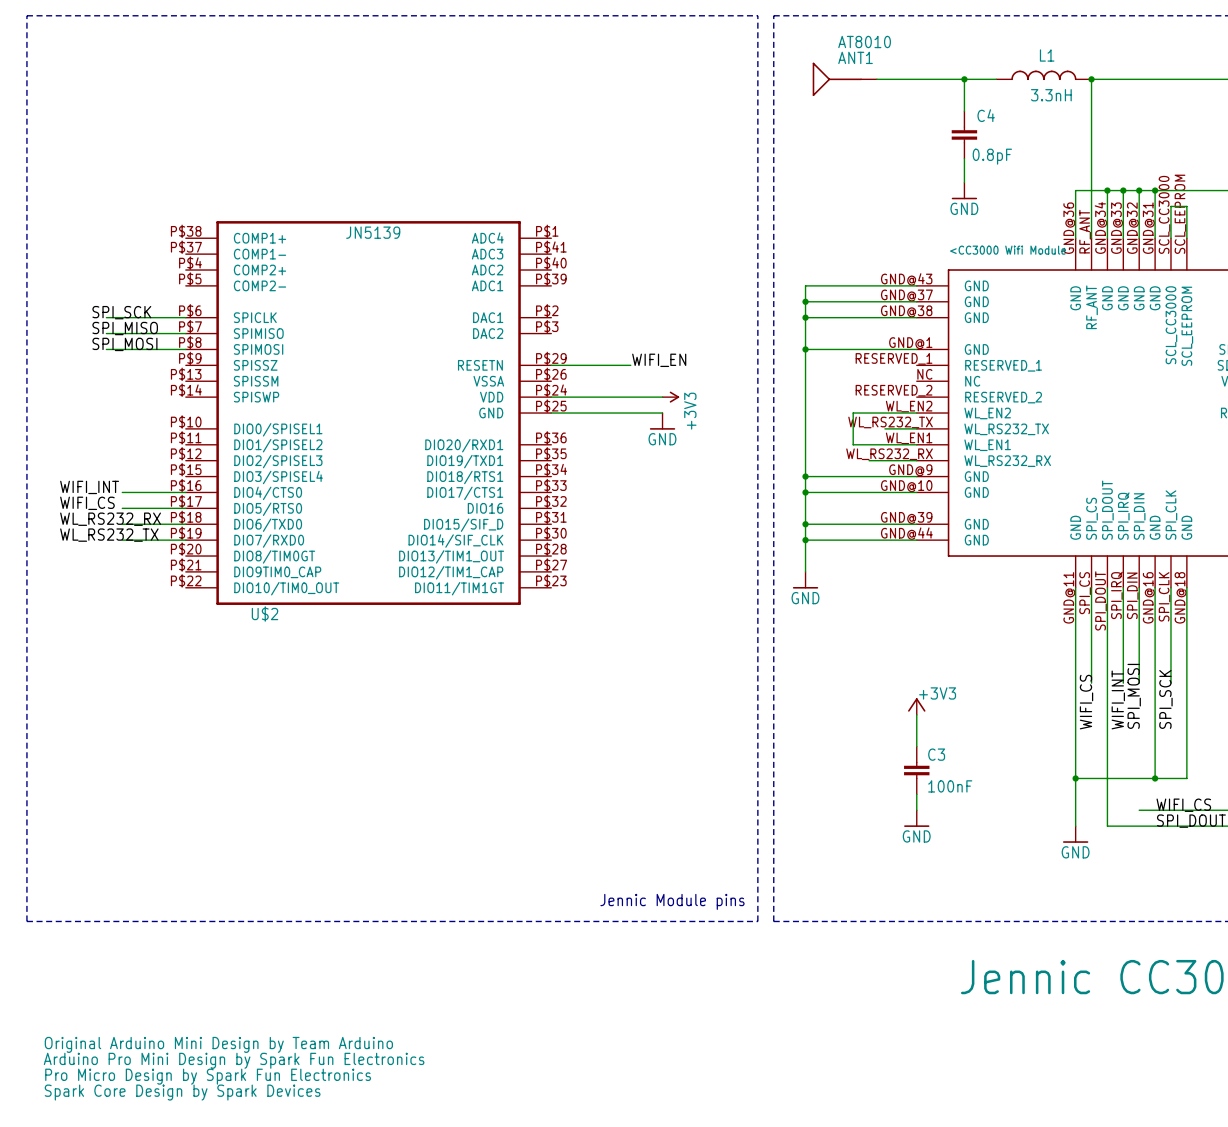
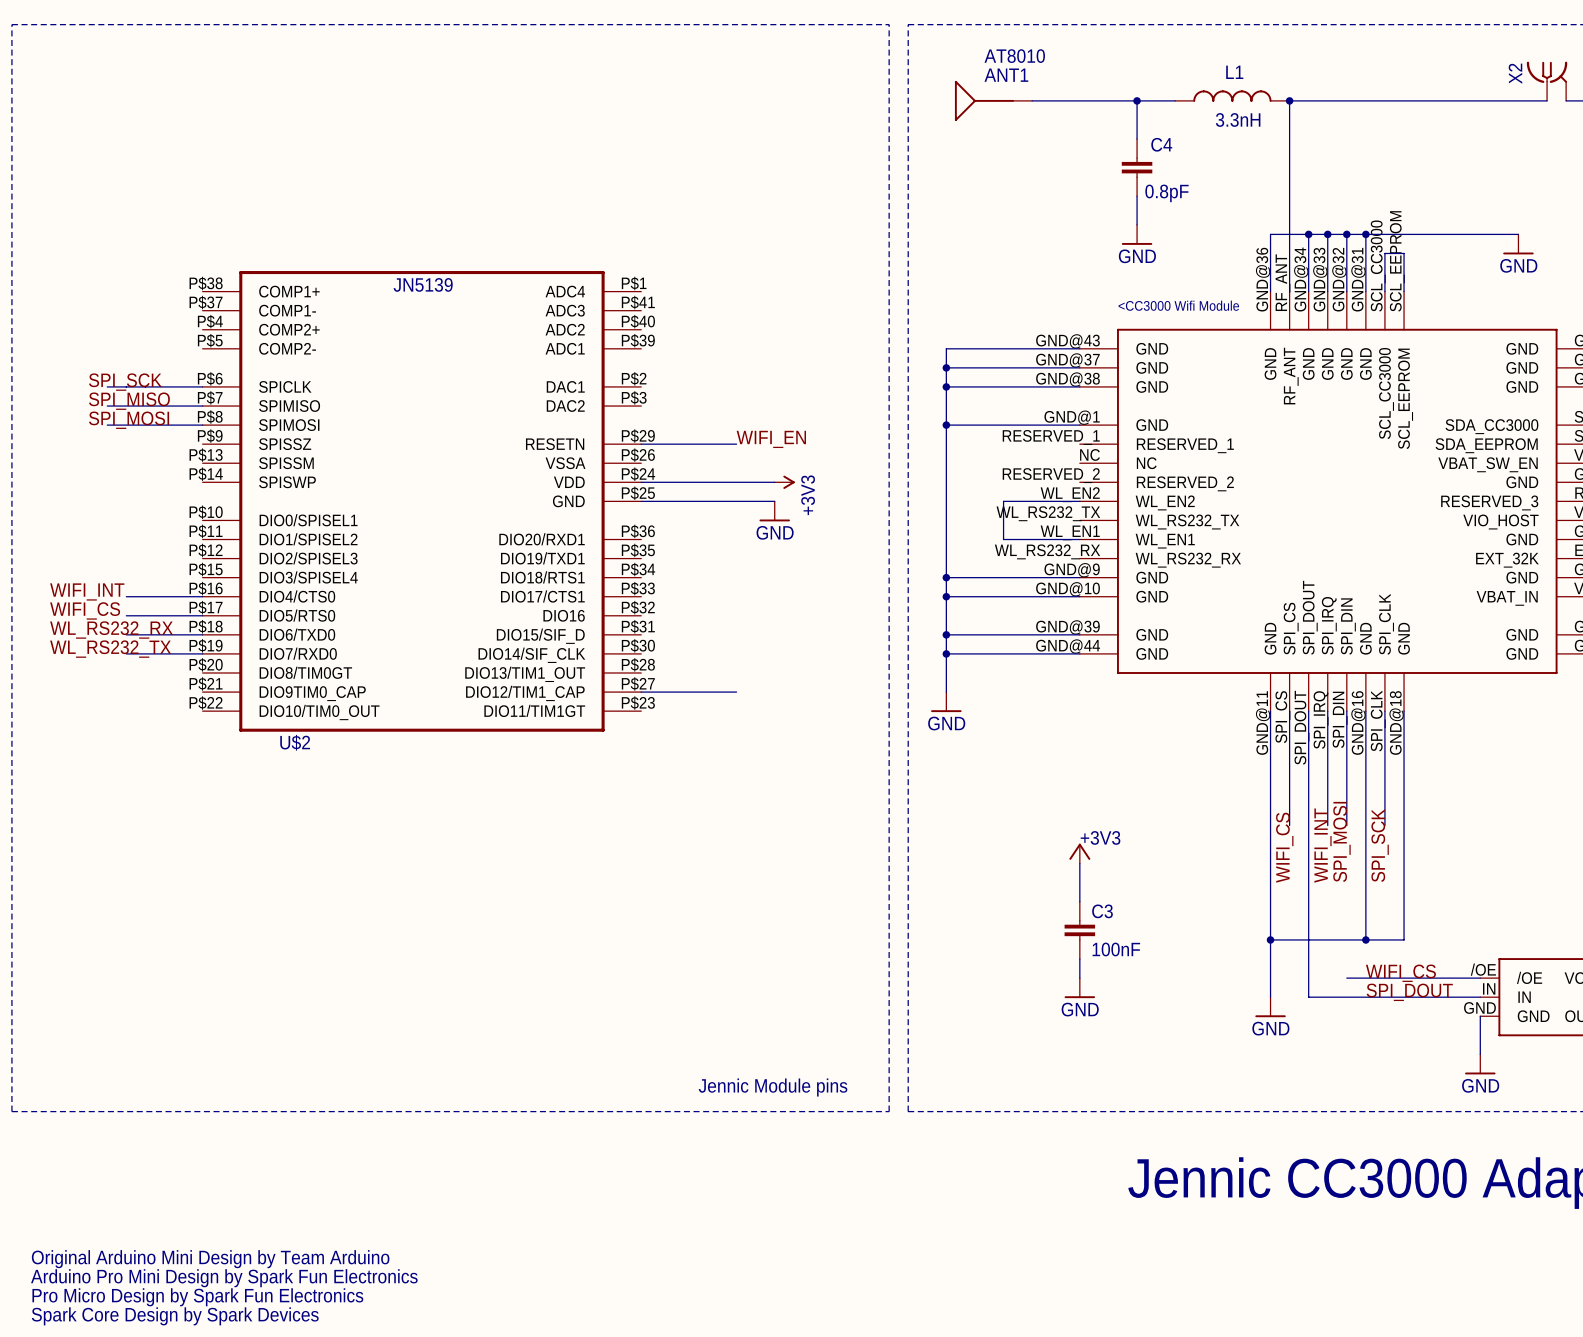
wire: (884, 428) (916, 428) -> none
wire: (869, 460) (916, 460) -> none
wire: none -> (641, 692) (736, 692)

